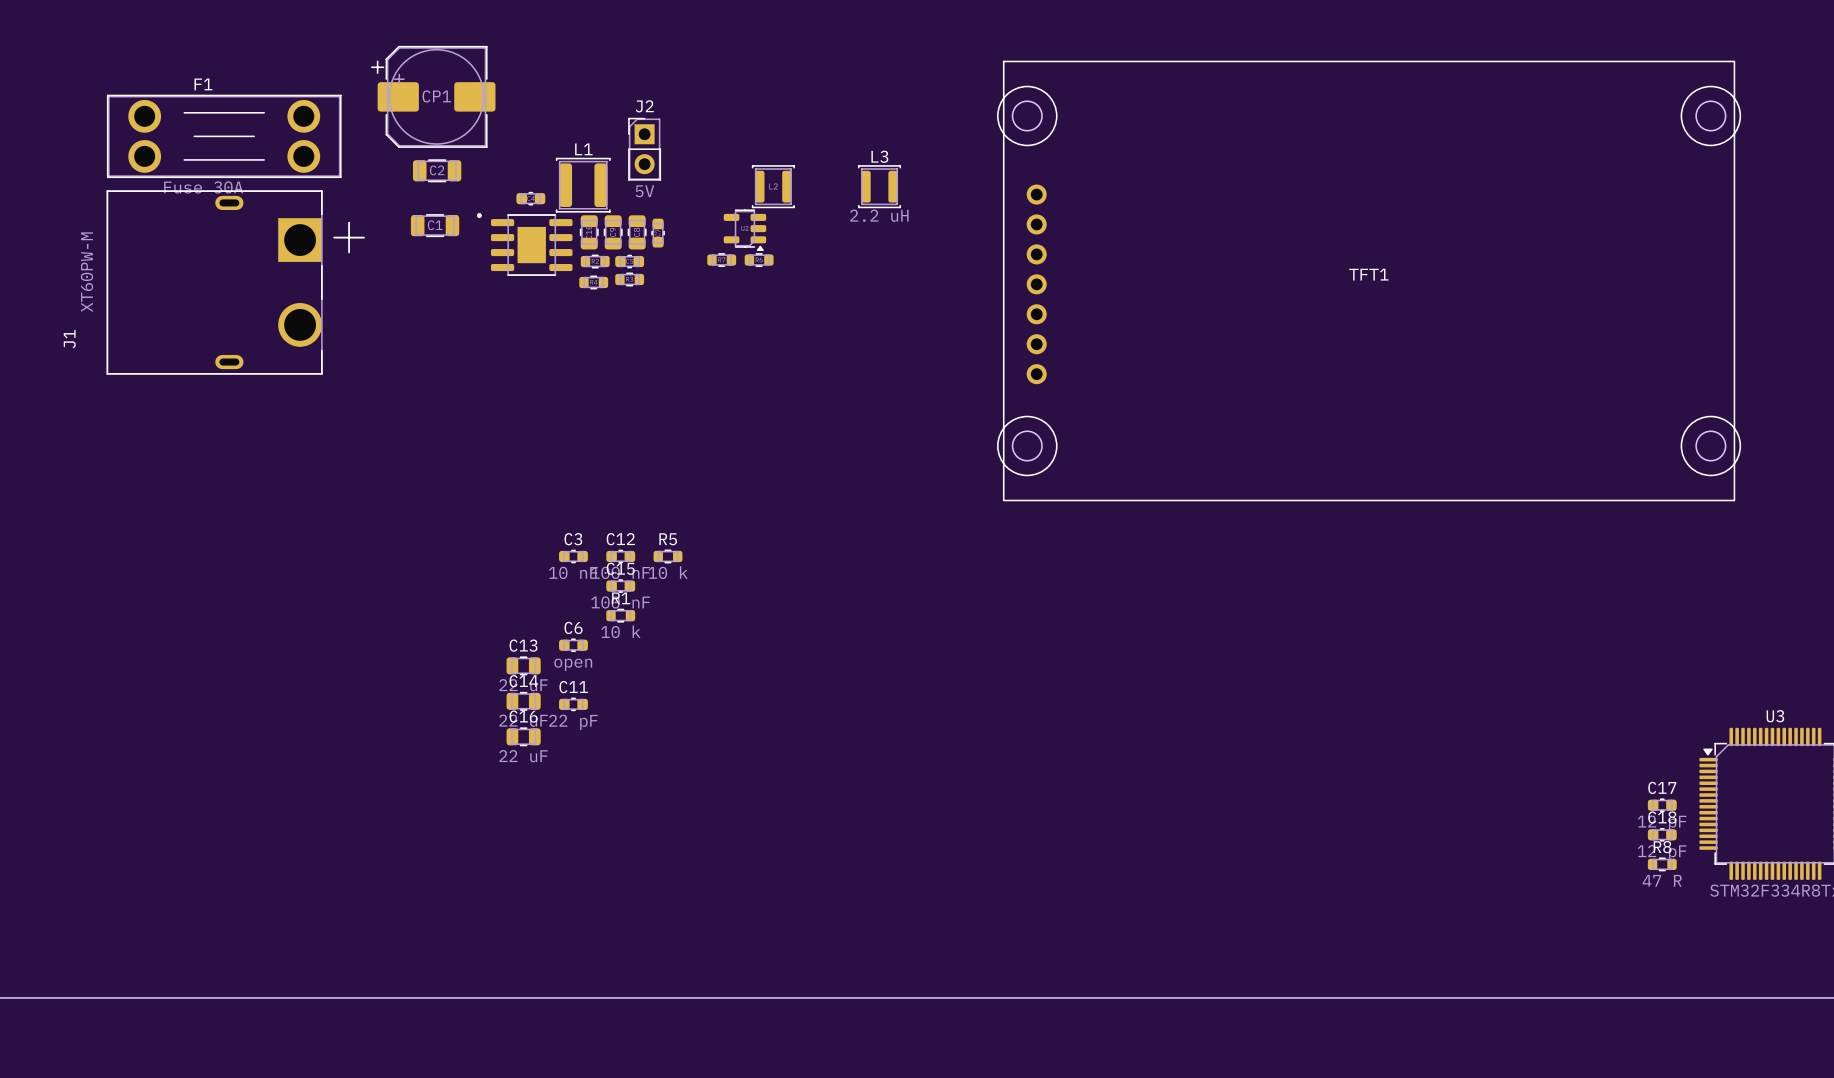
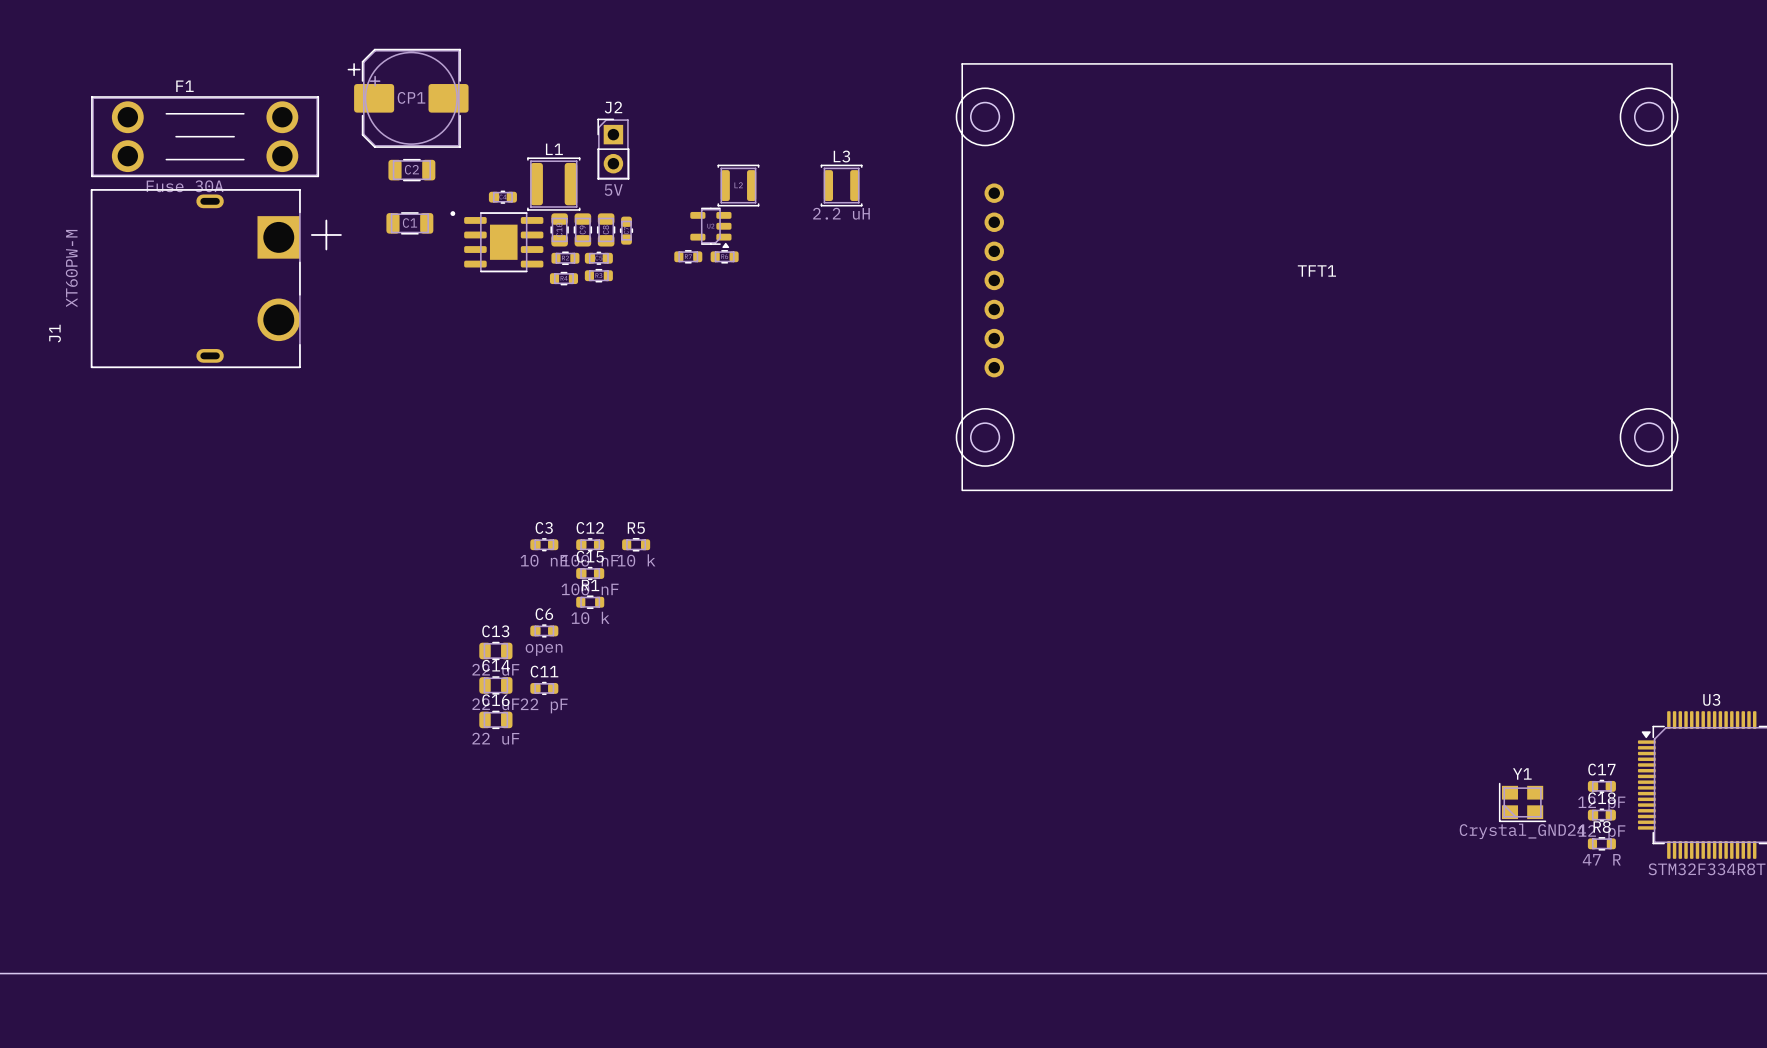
Y1: none -> Crystal_GND24 (1522, 802)

